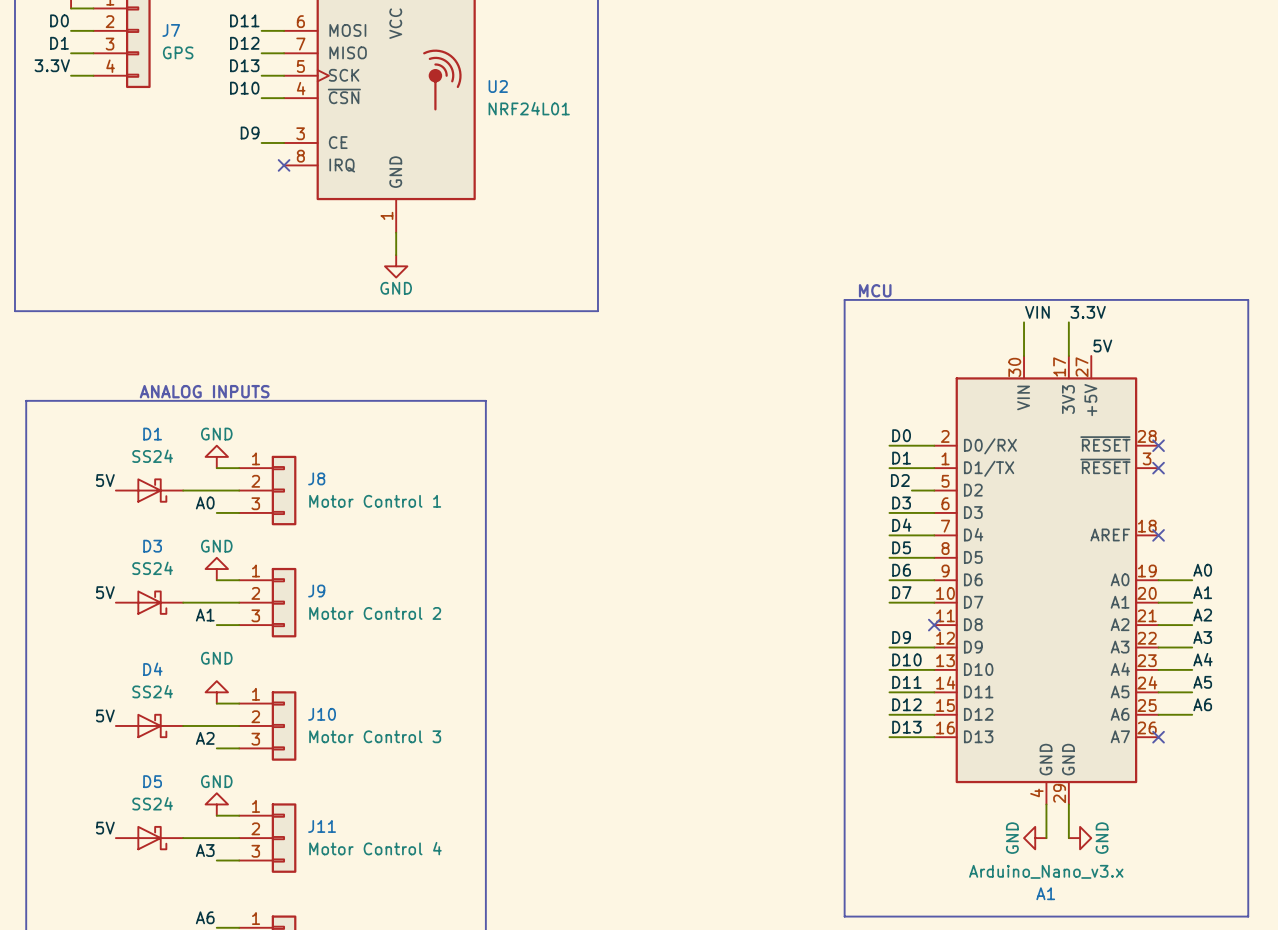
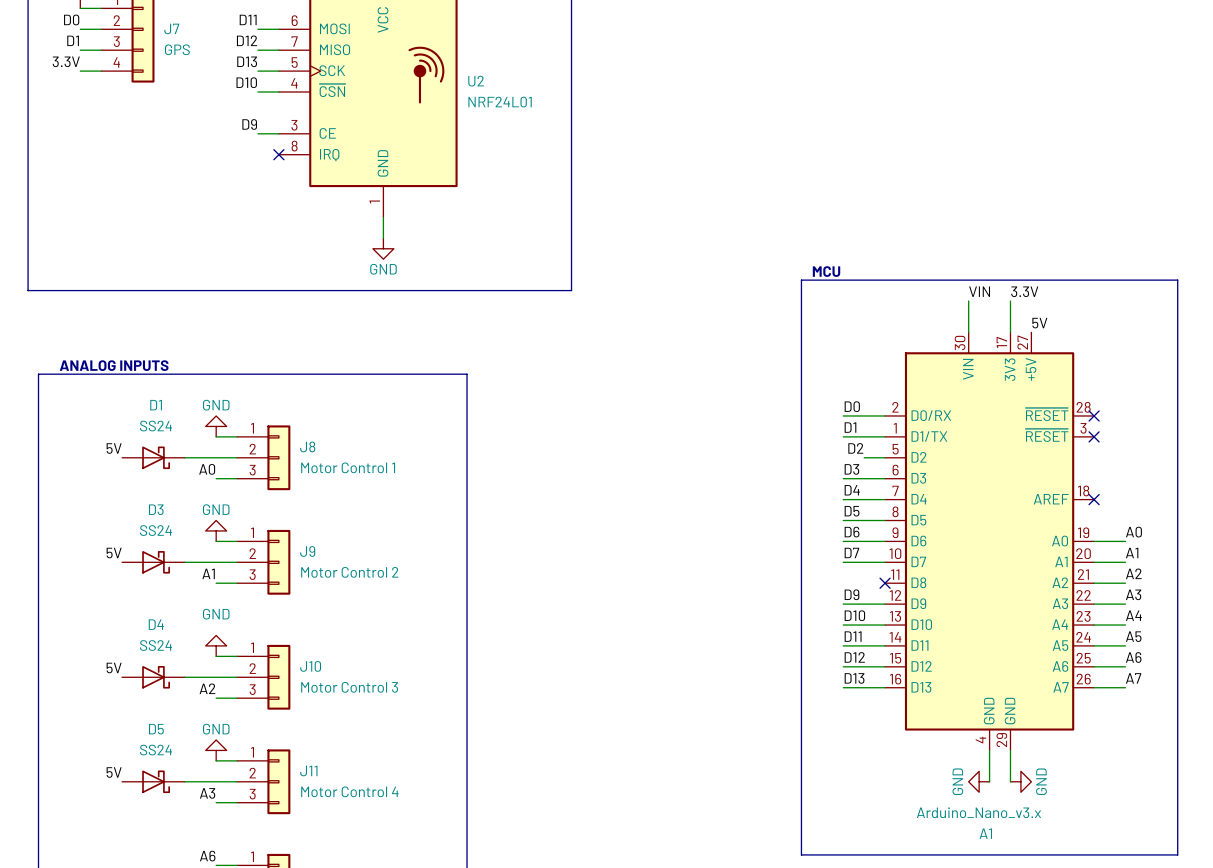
text position: ANALOG INPUTS (204, 391) -> ANALOG INPUTS (114, 365)
label: none -> A7 (1133, 678)
wire: none -> (1094, 687) (1125, 687)
no-connect mark: (1158, 737) -> none

